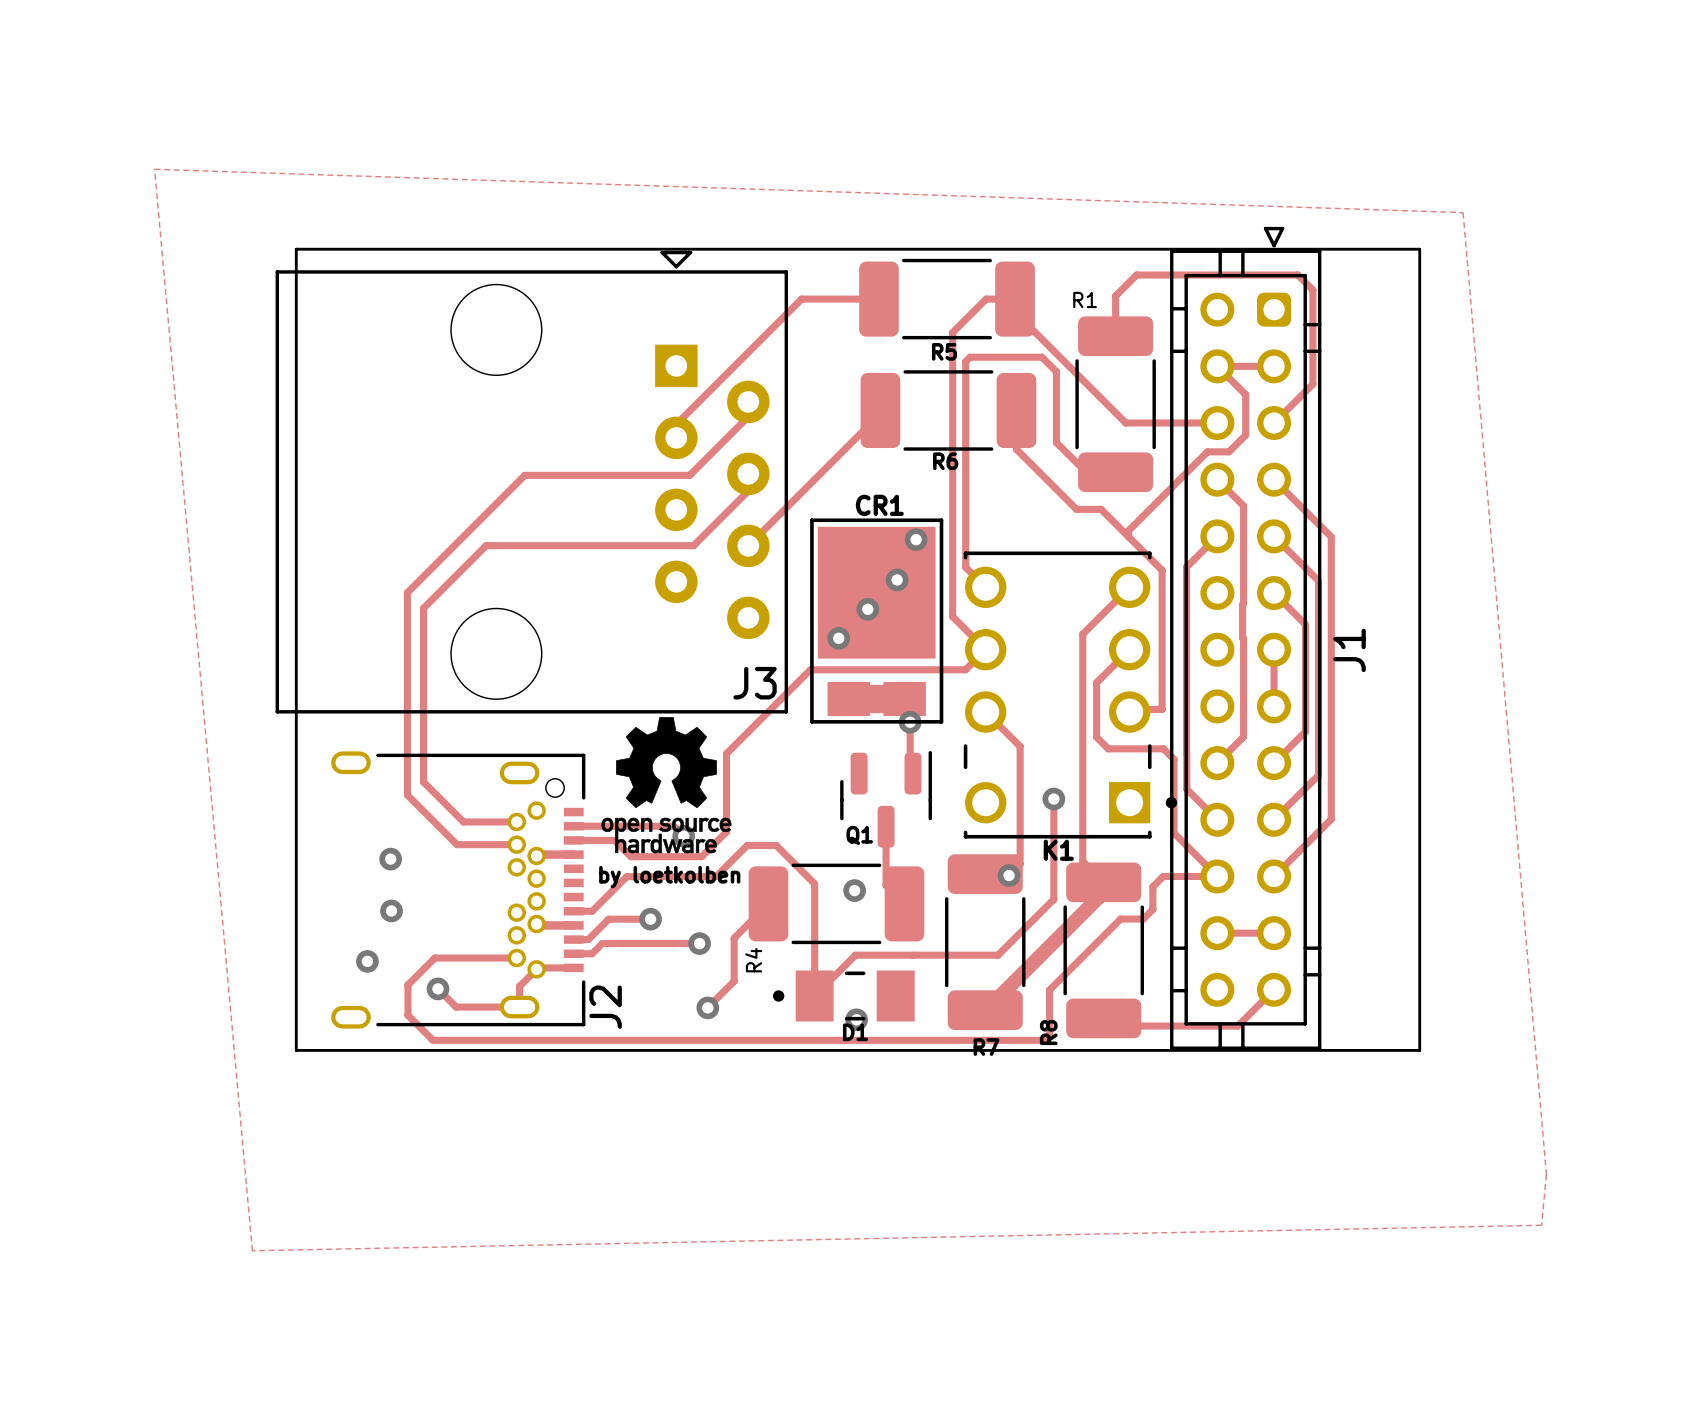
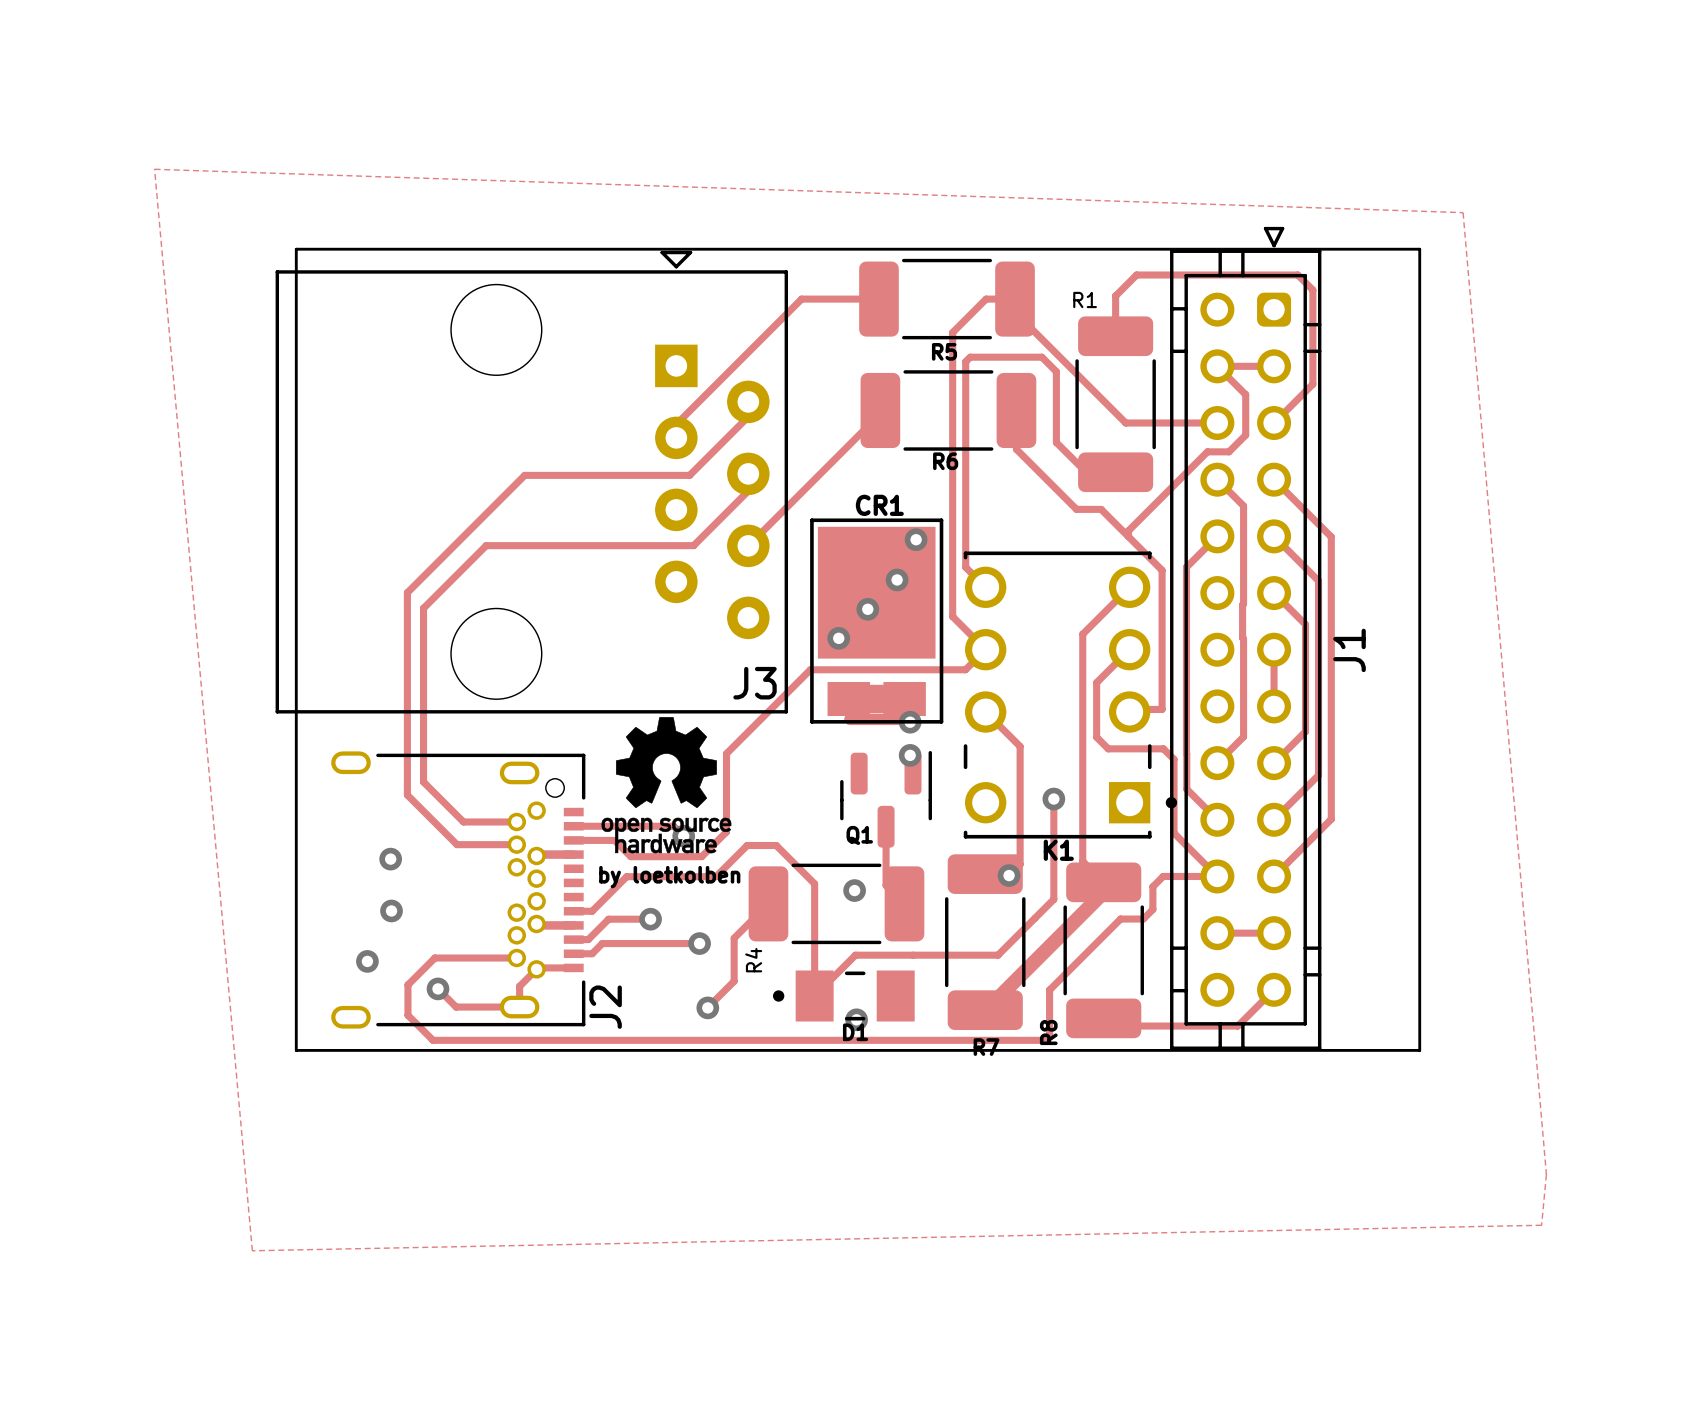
track: none -> (848, 698) (849, 719) (907, 719)
track: (910, 722) (910, 755) -> none
via: none -> (910, 755)

